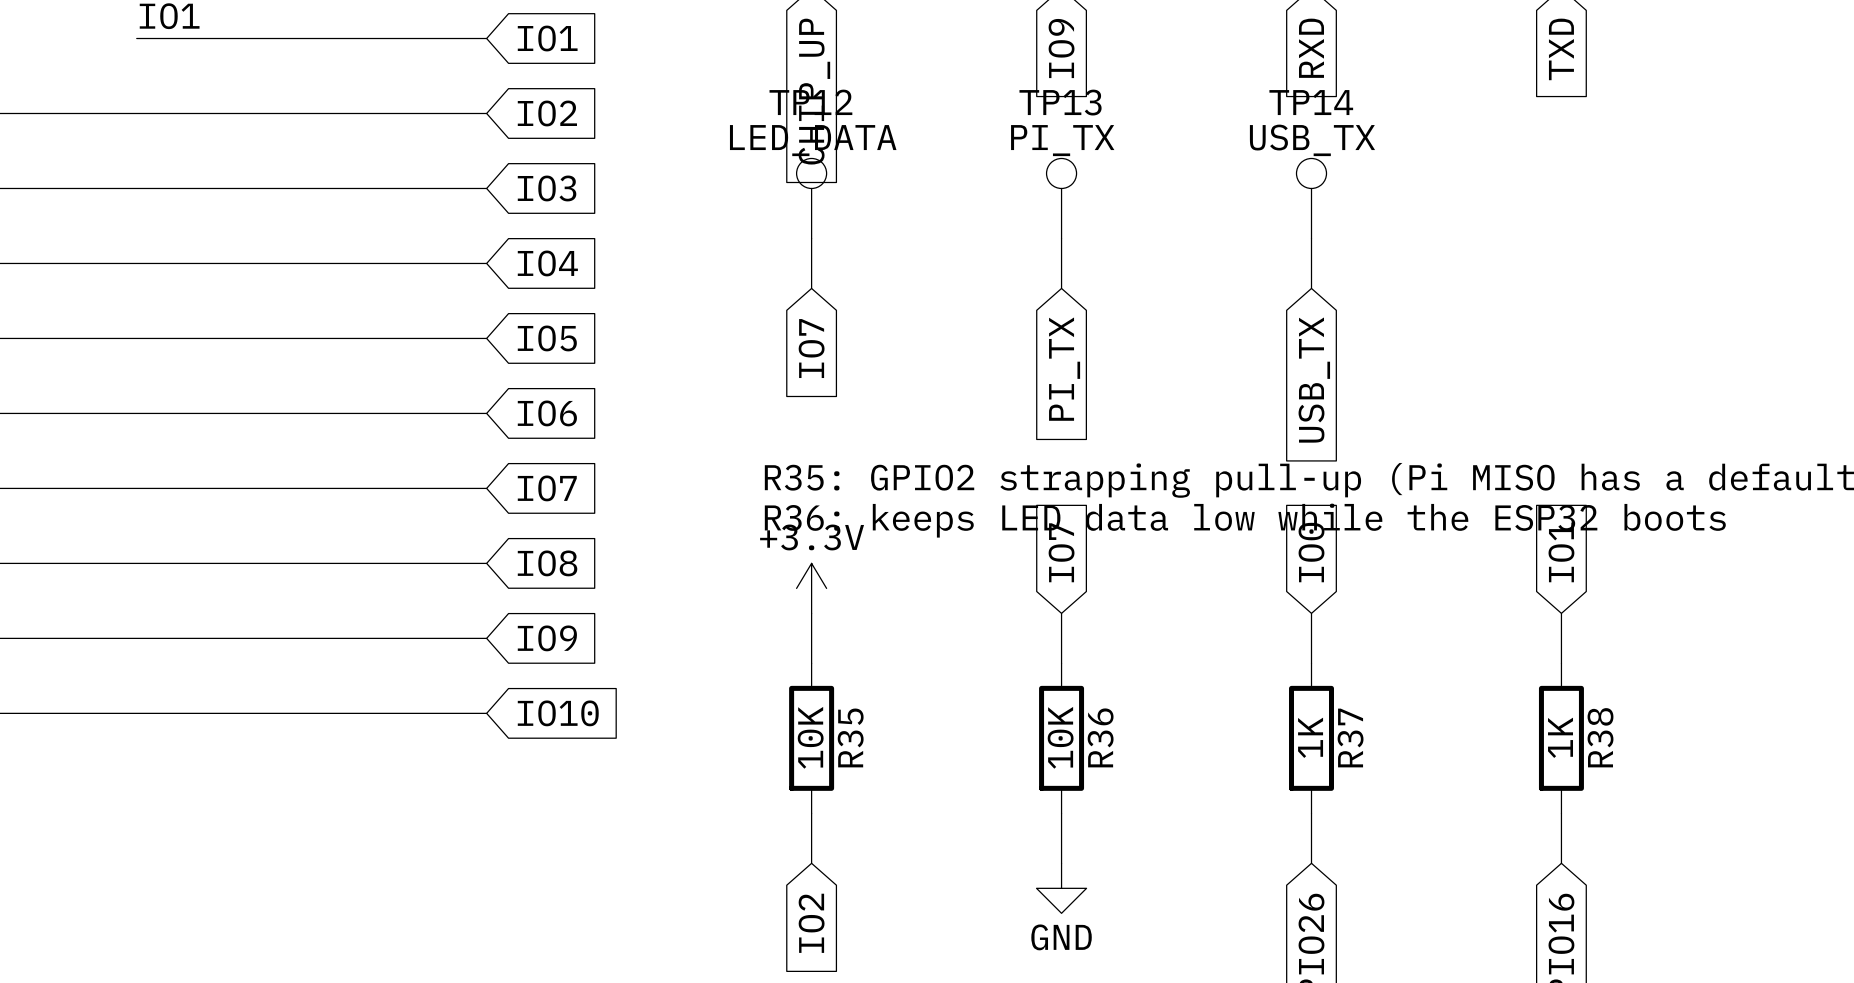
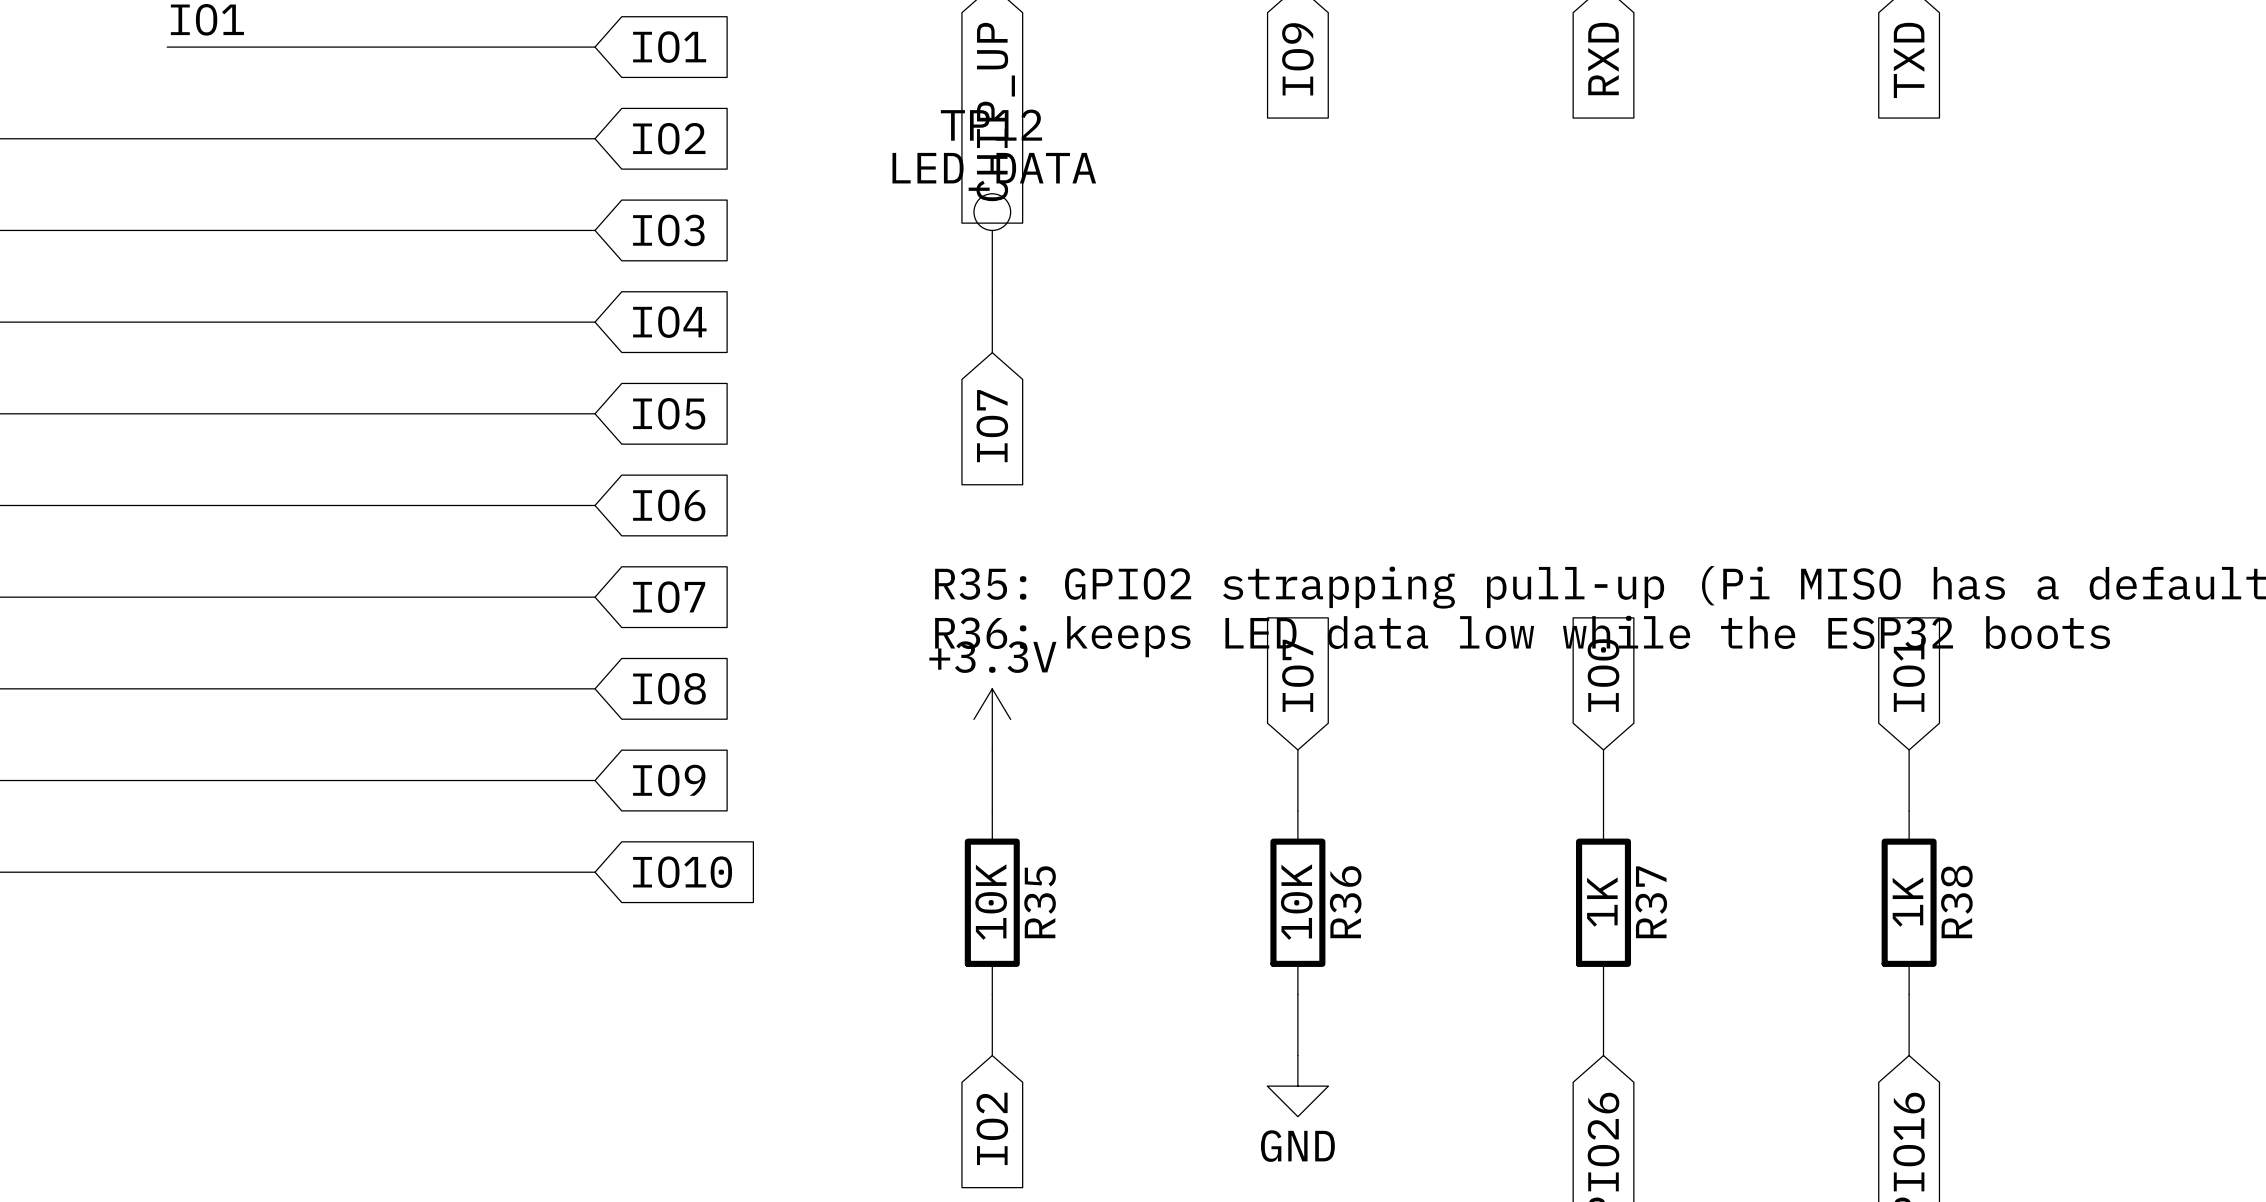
TP13: PI_TX (1061, 198) -> none
TP14: USB_TX (1311, 198) -> none
wire: (1061, 238) (1061, 288) -> none
wire: (1311, 238) (1311, 288) -> none
global label: PI_TX (1064, 369) -> none
global label: USB_TX (1314, 380) -> none

